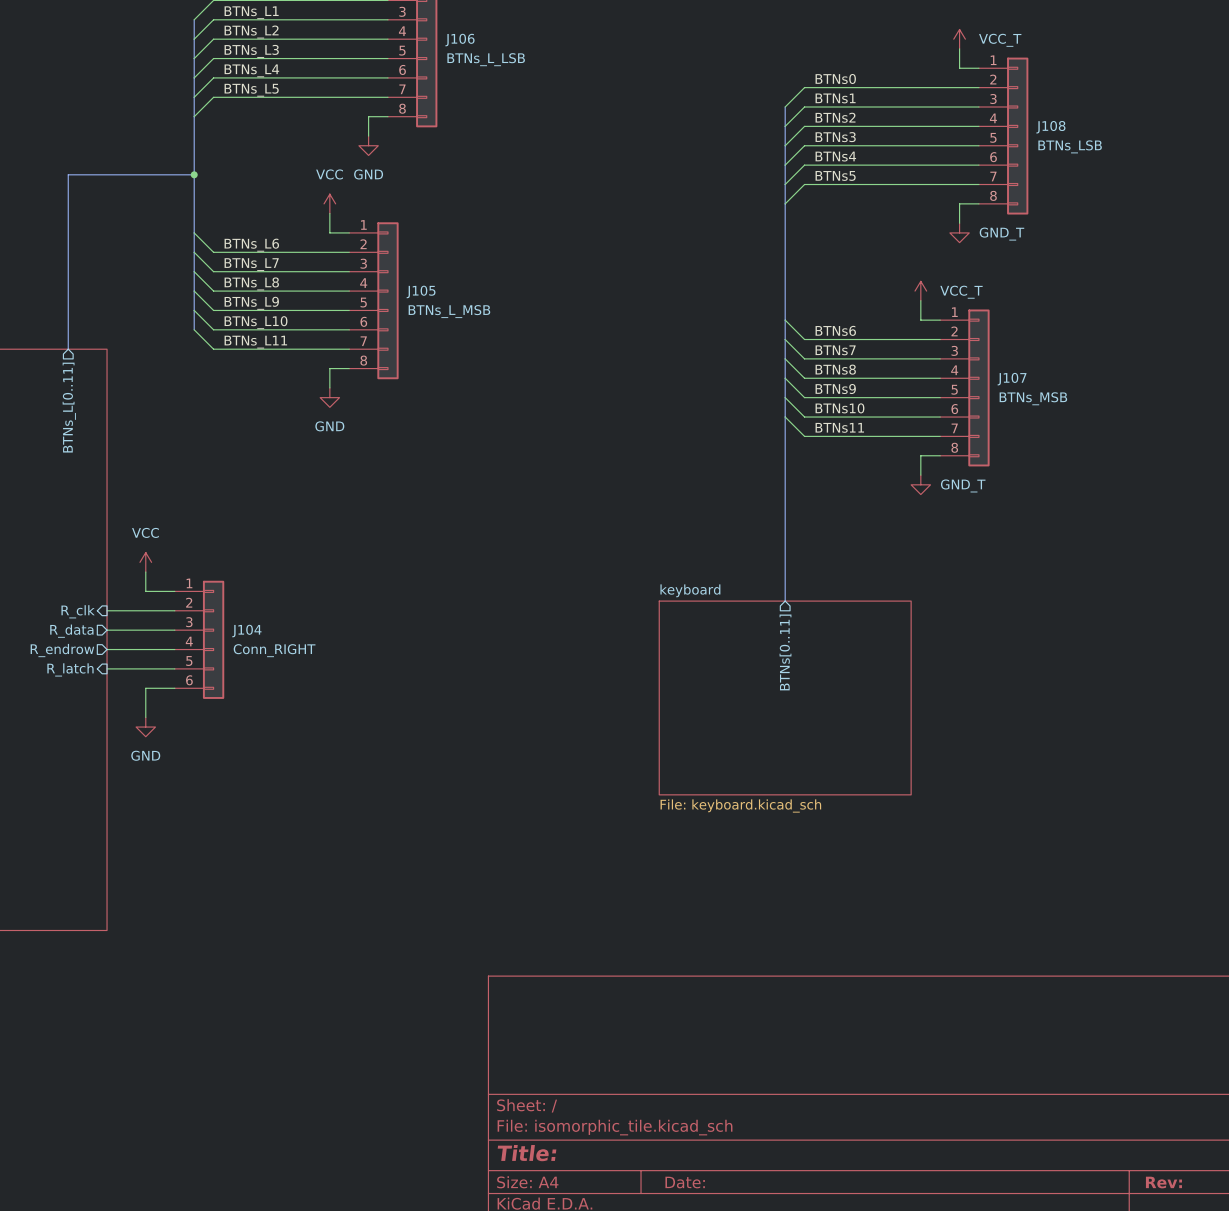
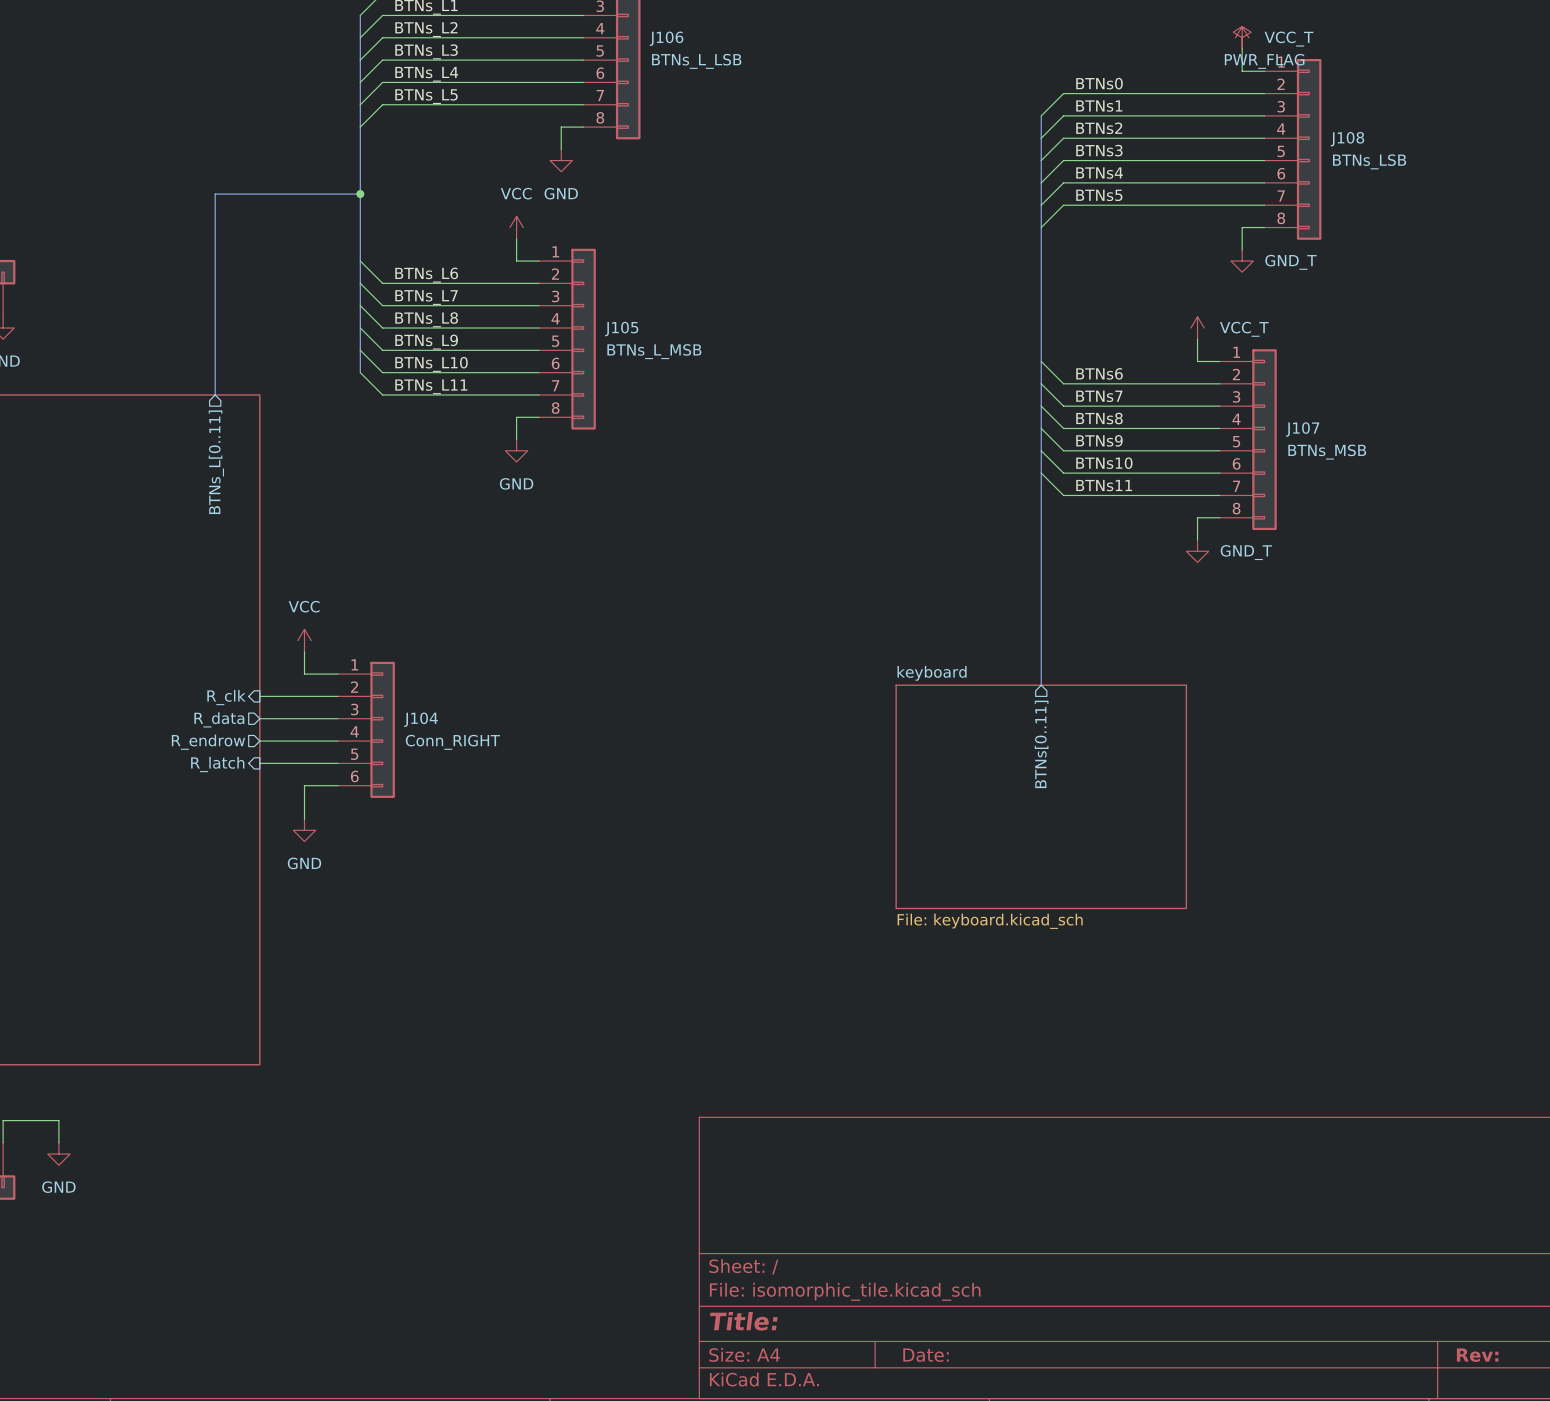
power symbol: none -> PWR_FLAG (1242, 37)

